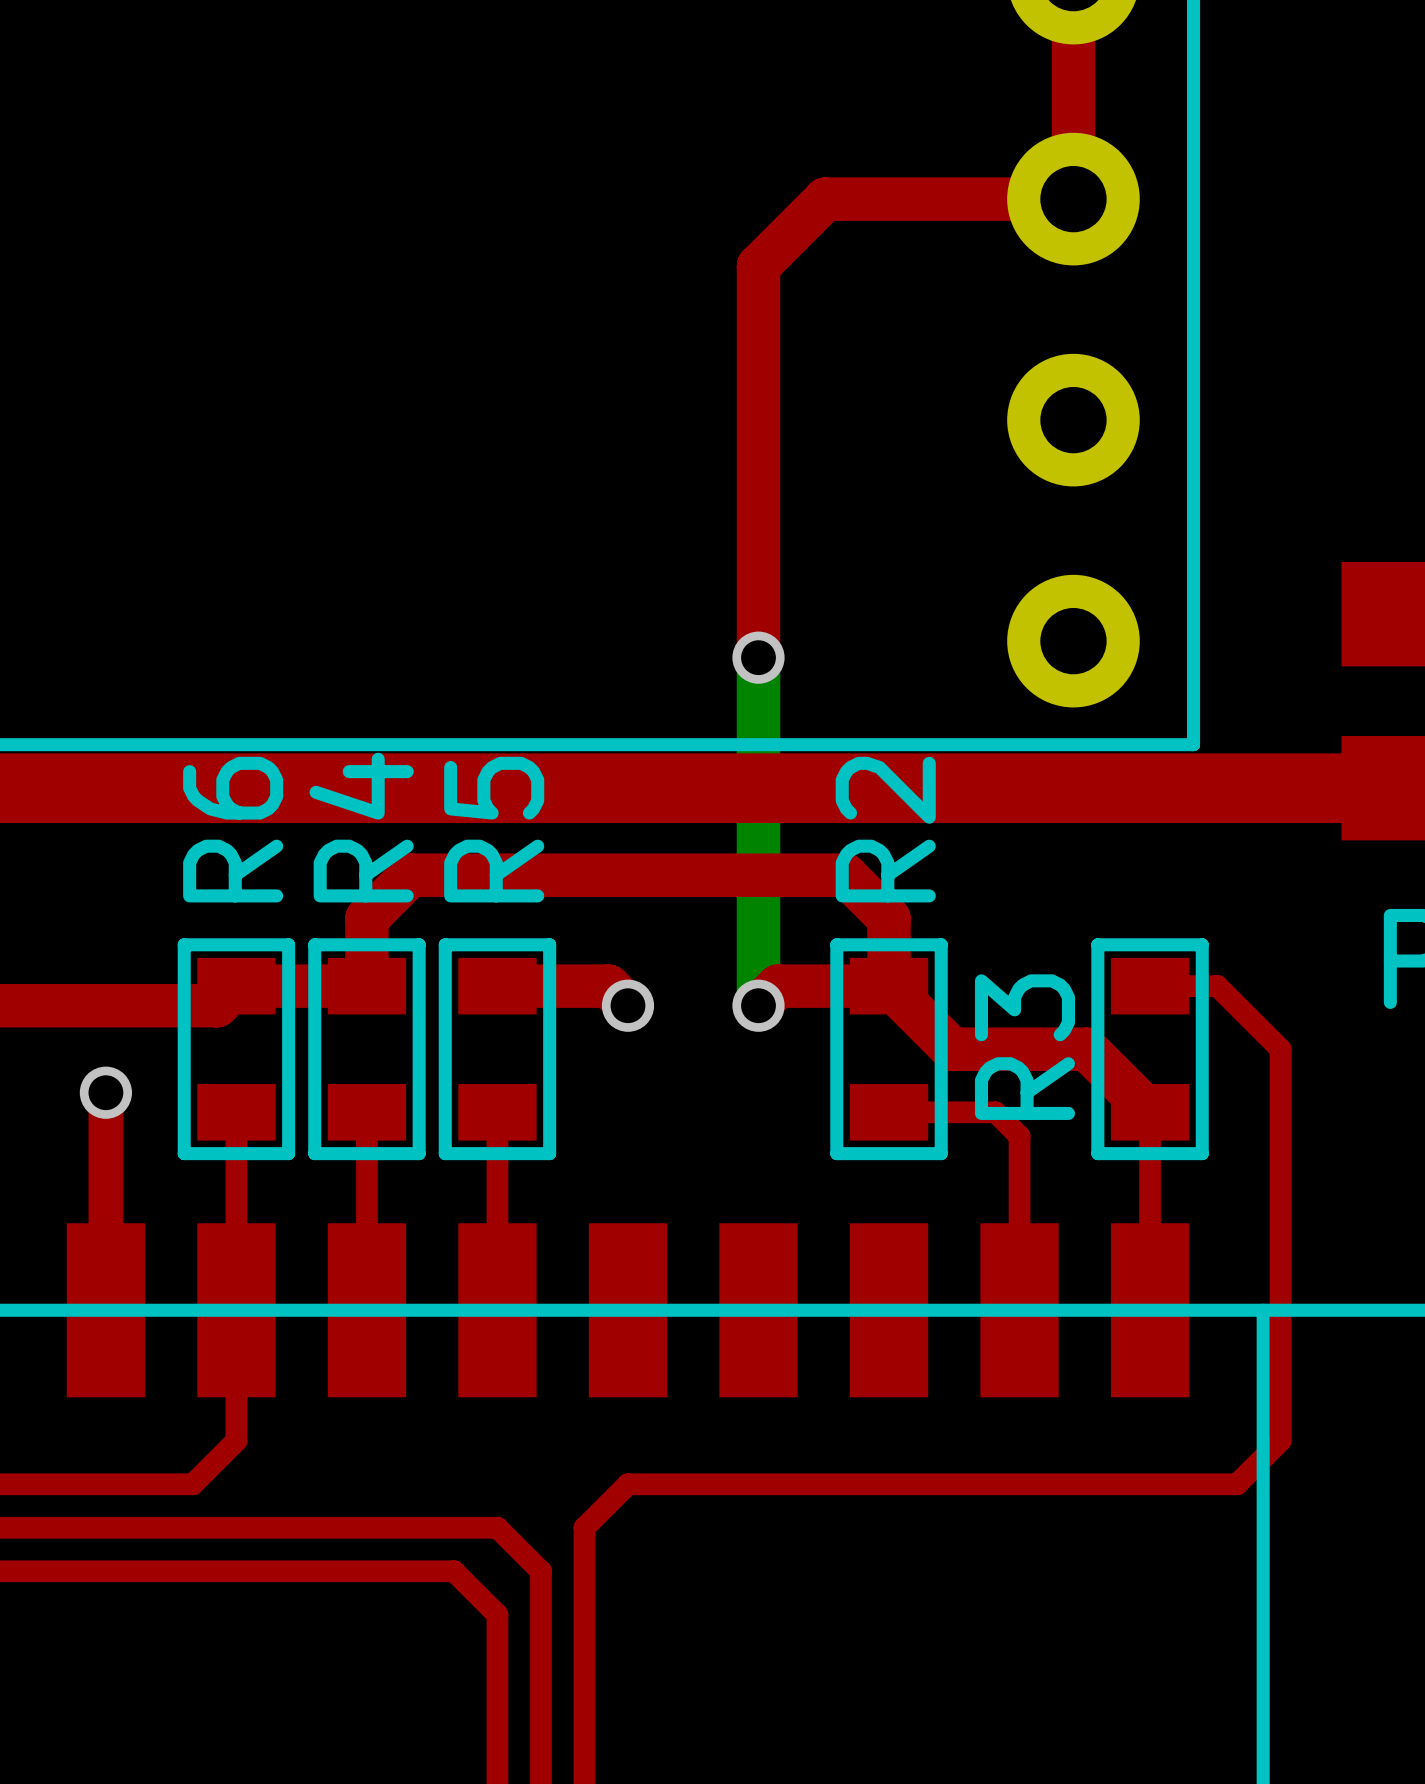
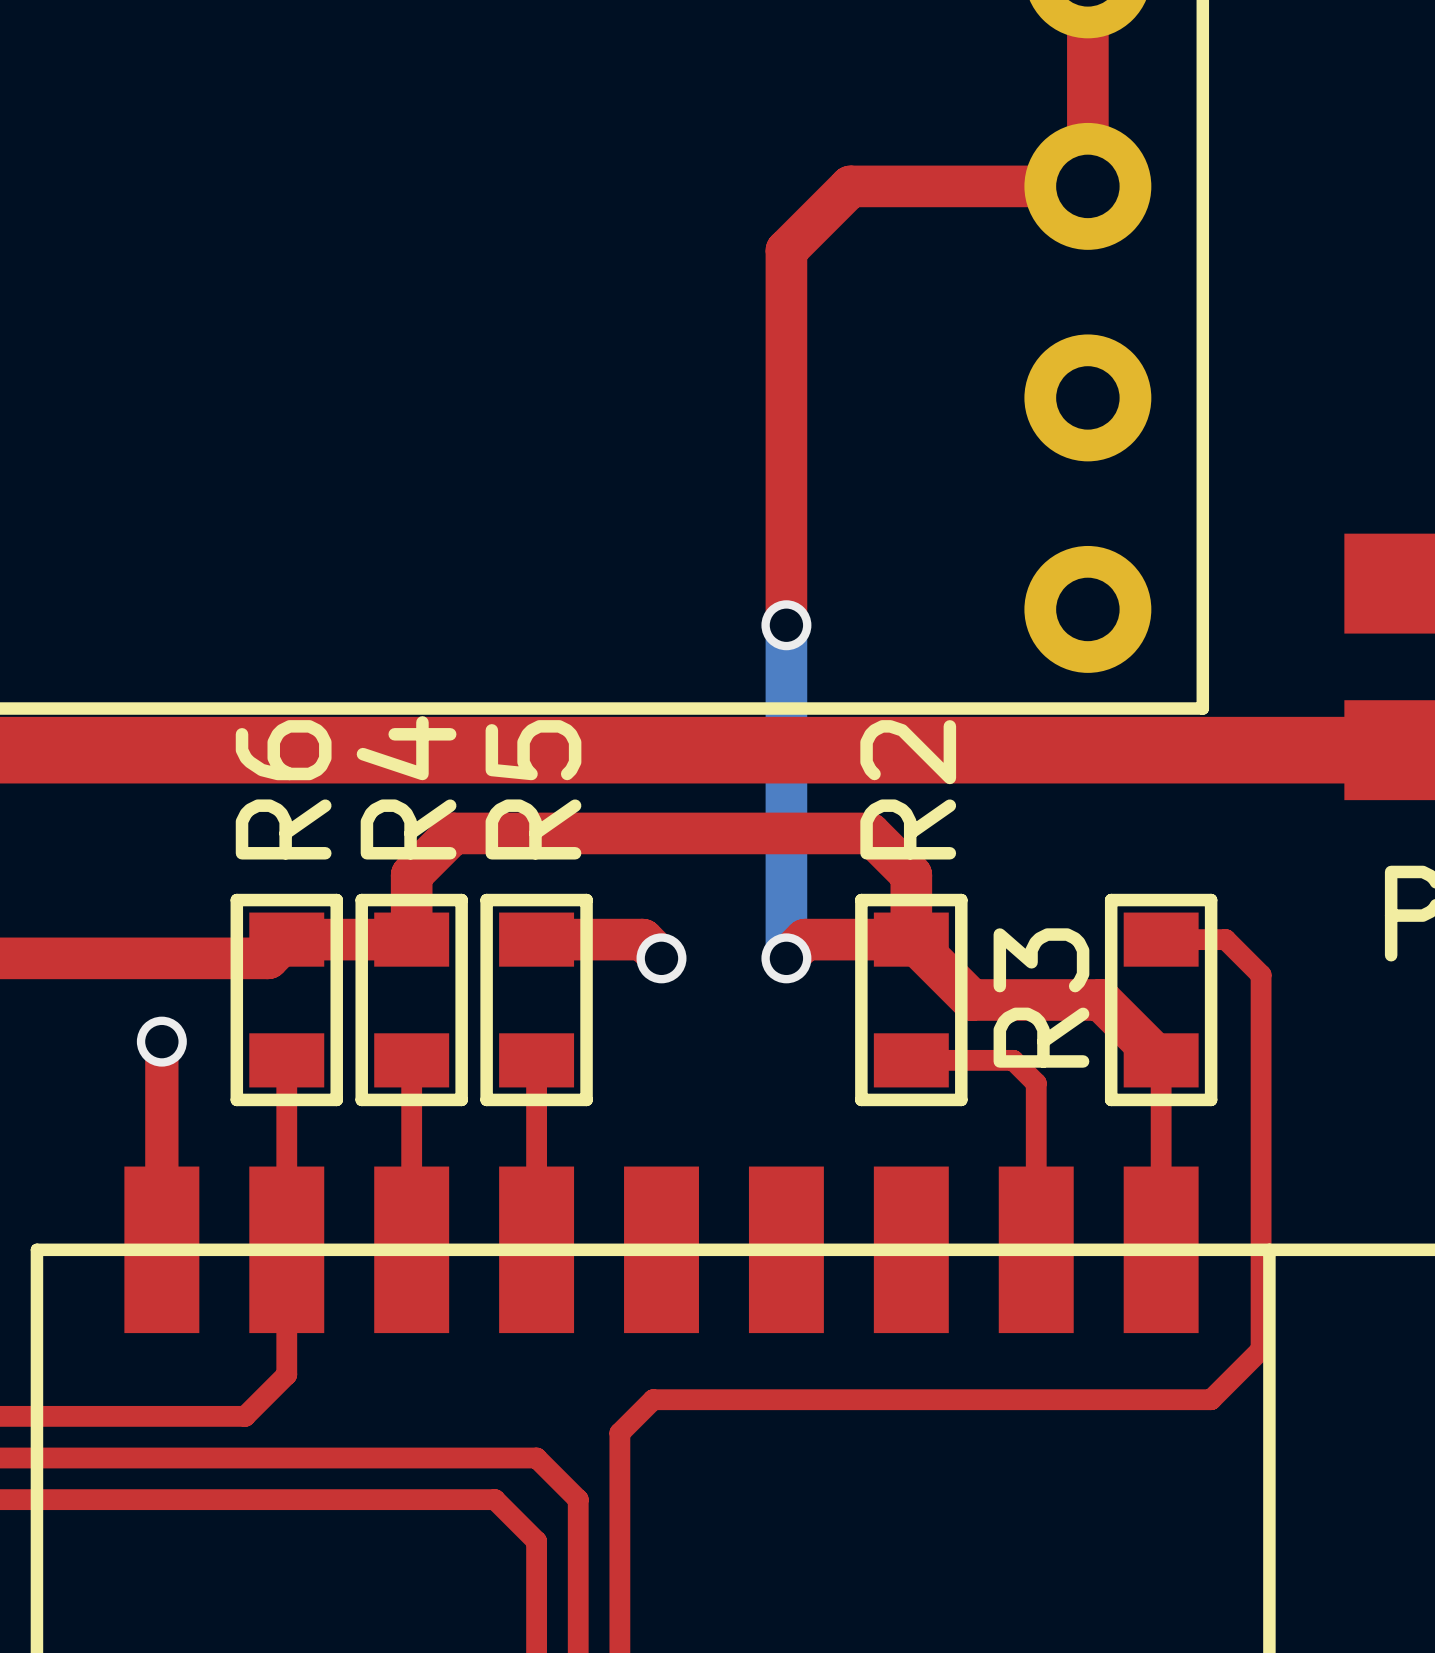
top track: (1254, 1023) (1280, 1049) (1280, 1440) (1237, 1484) (627, 1484) (584, 1527) -> (1261, 975) (1261, 1349) (1211, 1399) (653, 1399) (619, 1433) (619, 1458)

